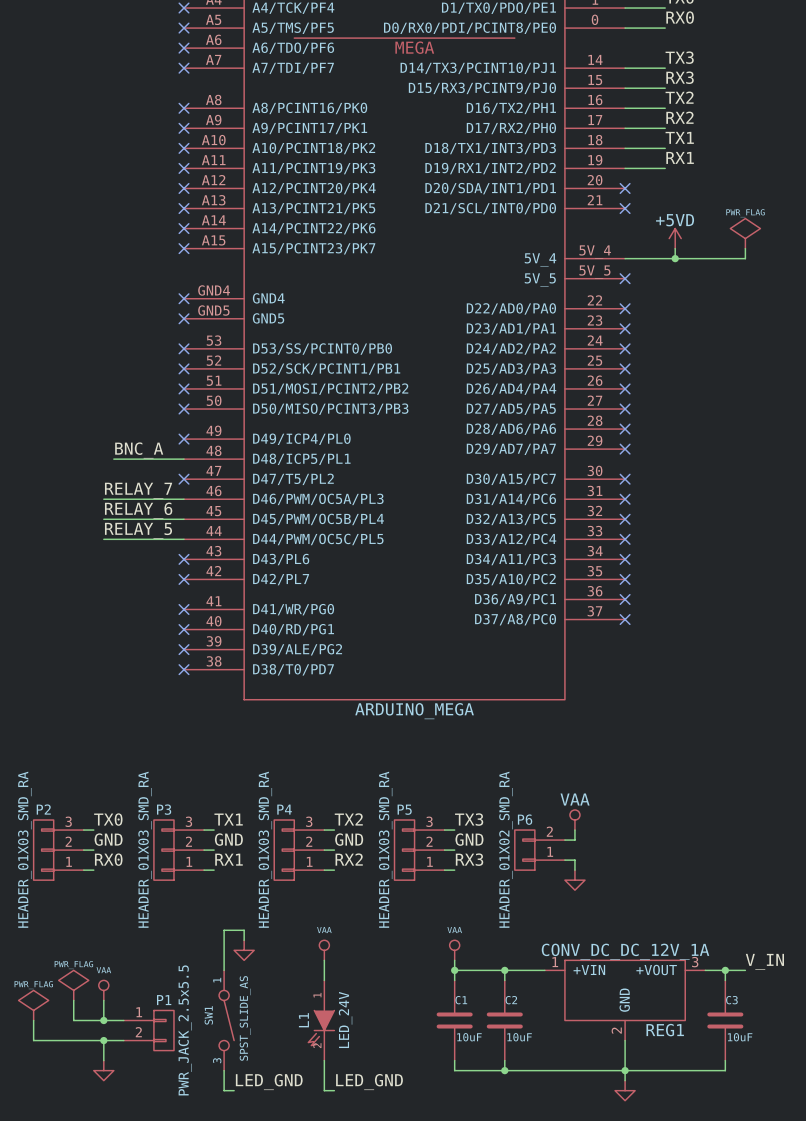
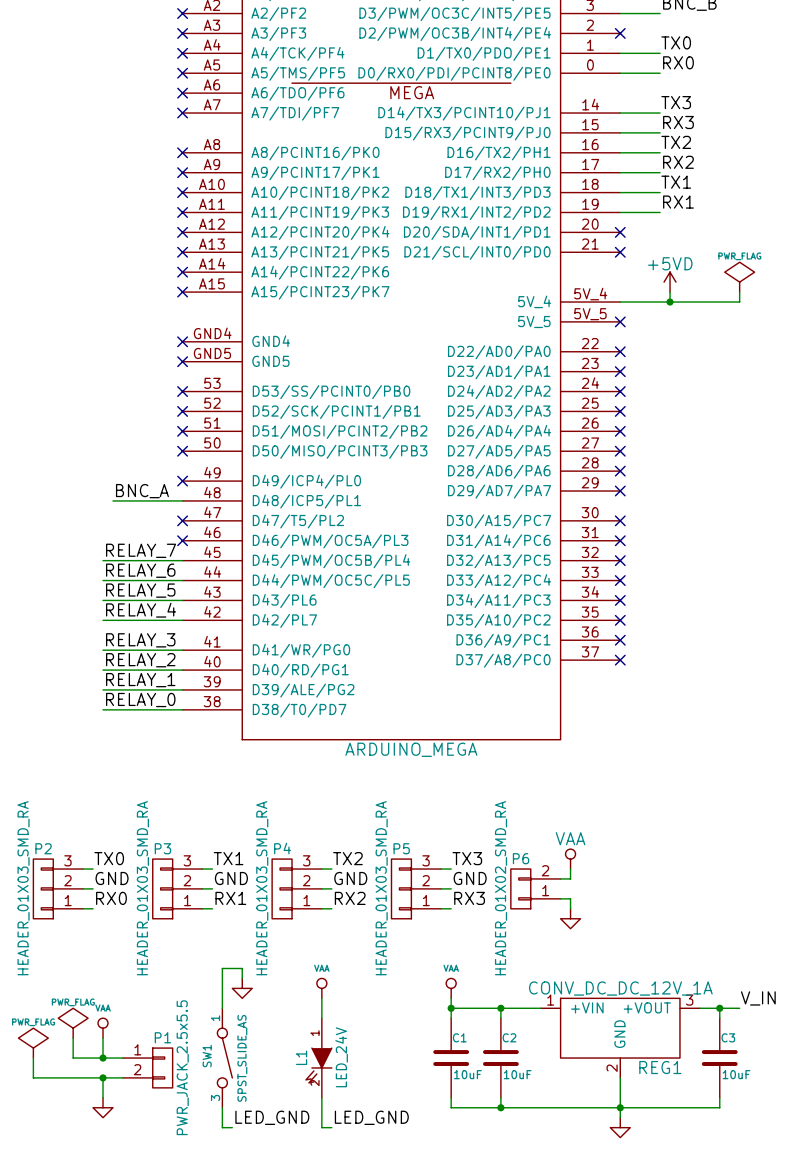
label: RELAY_7 (138, 490) -> none
wire: (103, 499) (184, 499) -> (103, 600) (182, 600)
no-connect mark: none -> (182, 540)
label: RELAY_6 (138, 510) -> RELAY_7 (141, 550)
label: RELAY_5 (138, 530) -> RELAY_6 (140, 570)
label: none -> RELAY_5 (140, 590)
no-connect mark: (184, 559) -> none
label: none -> RELAY_4 (141, 610)
wire: none -> (103, 620) (182, 620)
no-connect mark: (184, 579) -> none
label: none -> RELAY_3 (140, 640)
wire: none -> (103, 650) (182, 650)
no-connect mark: (184, 609) -> none
label: none -> RELAY_2 (140, 660)
wire: none -> (103, 670) (182, 670)
no-connect mark: (184, 629) -> none
label: none -> RELAY_1 (140, 680)
wire: none -> (103, 689) (182, 689)
no-connect mark: (184, 649) -> none
label: none -> RELAY_0 (140, 700)
wire: none -> (103, 709) (182, 709)
no-connect mark: (184, 669) -> none

